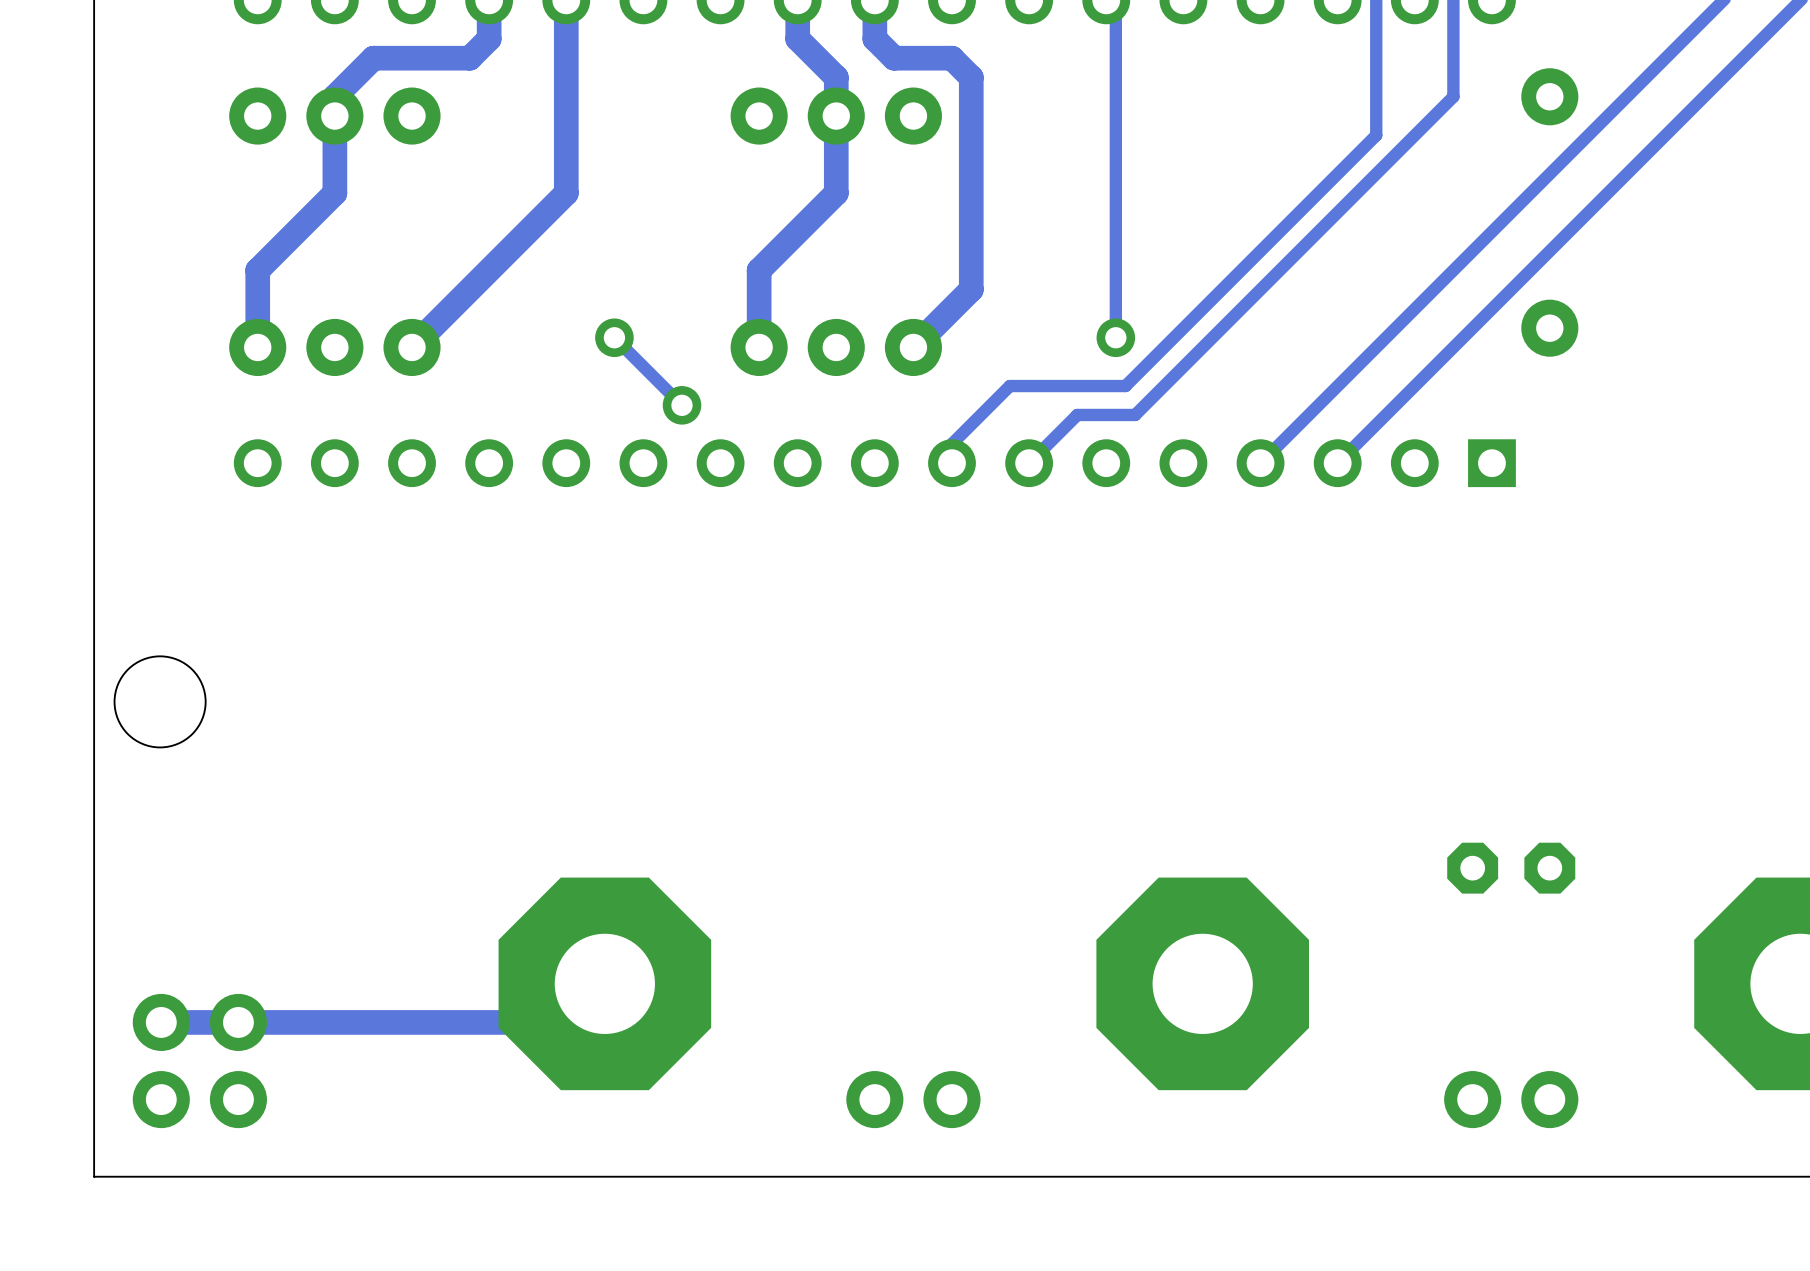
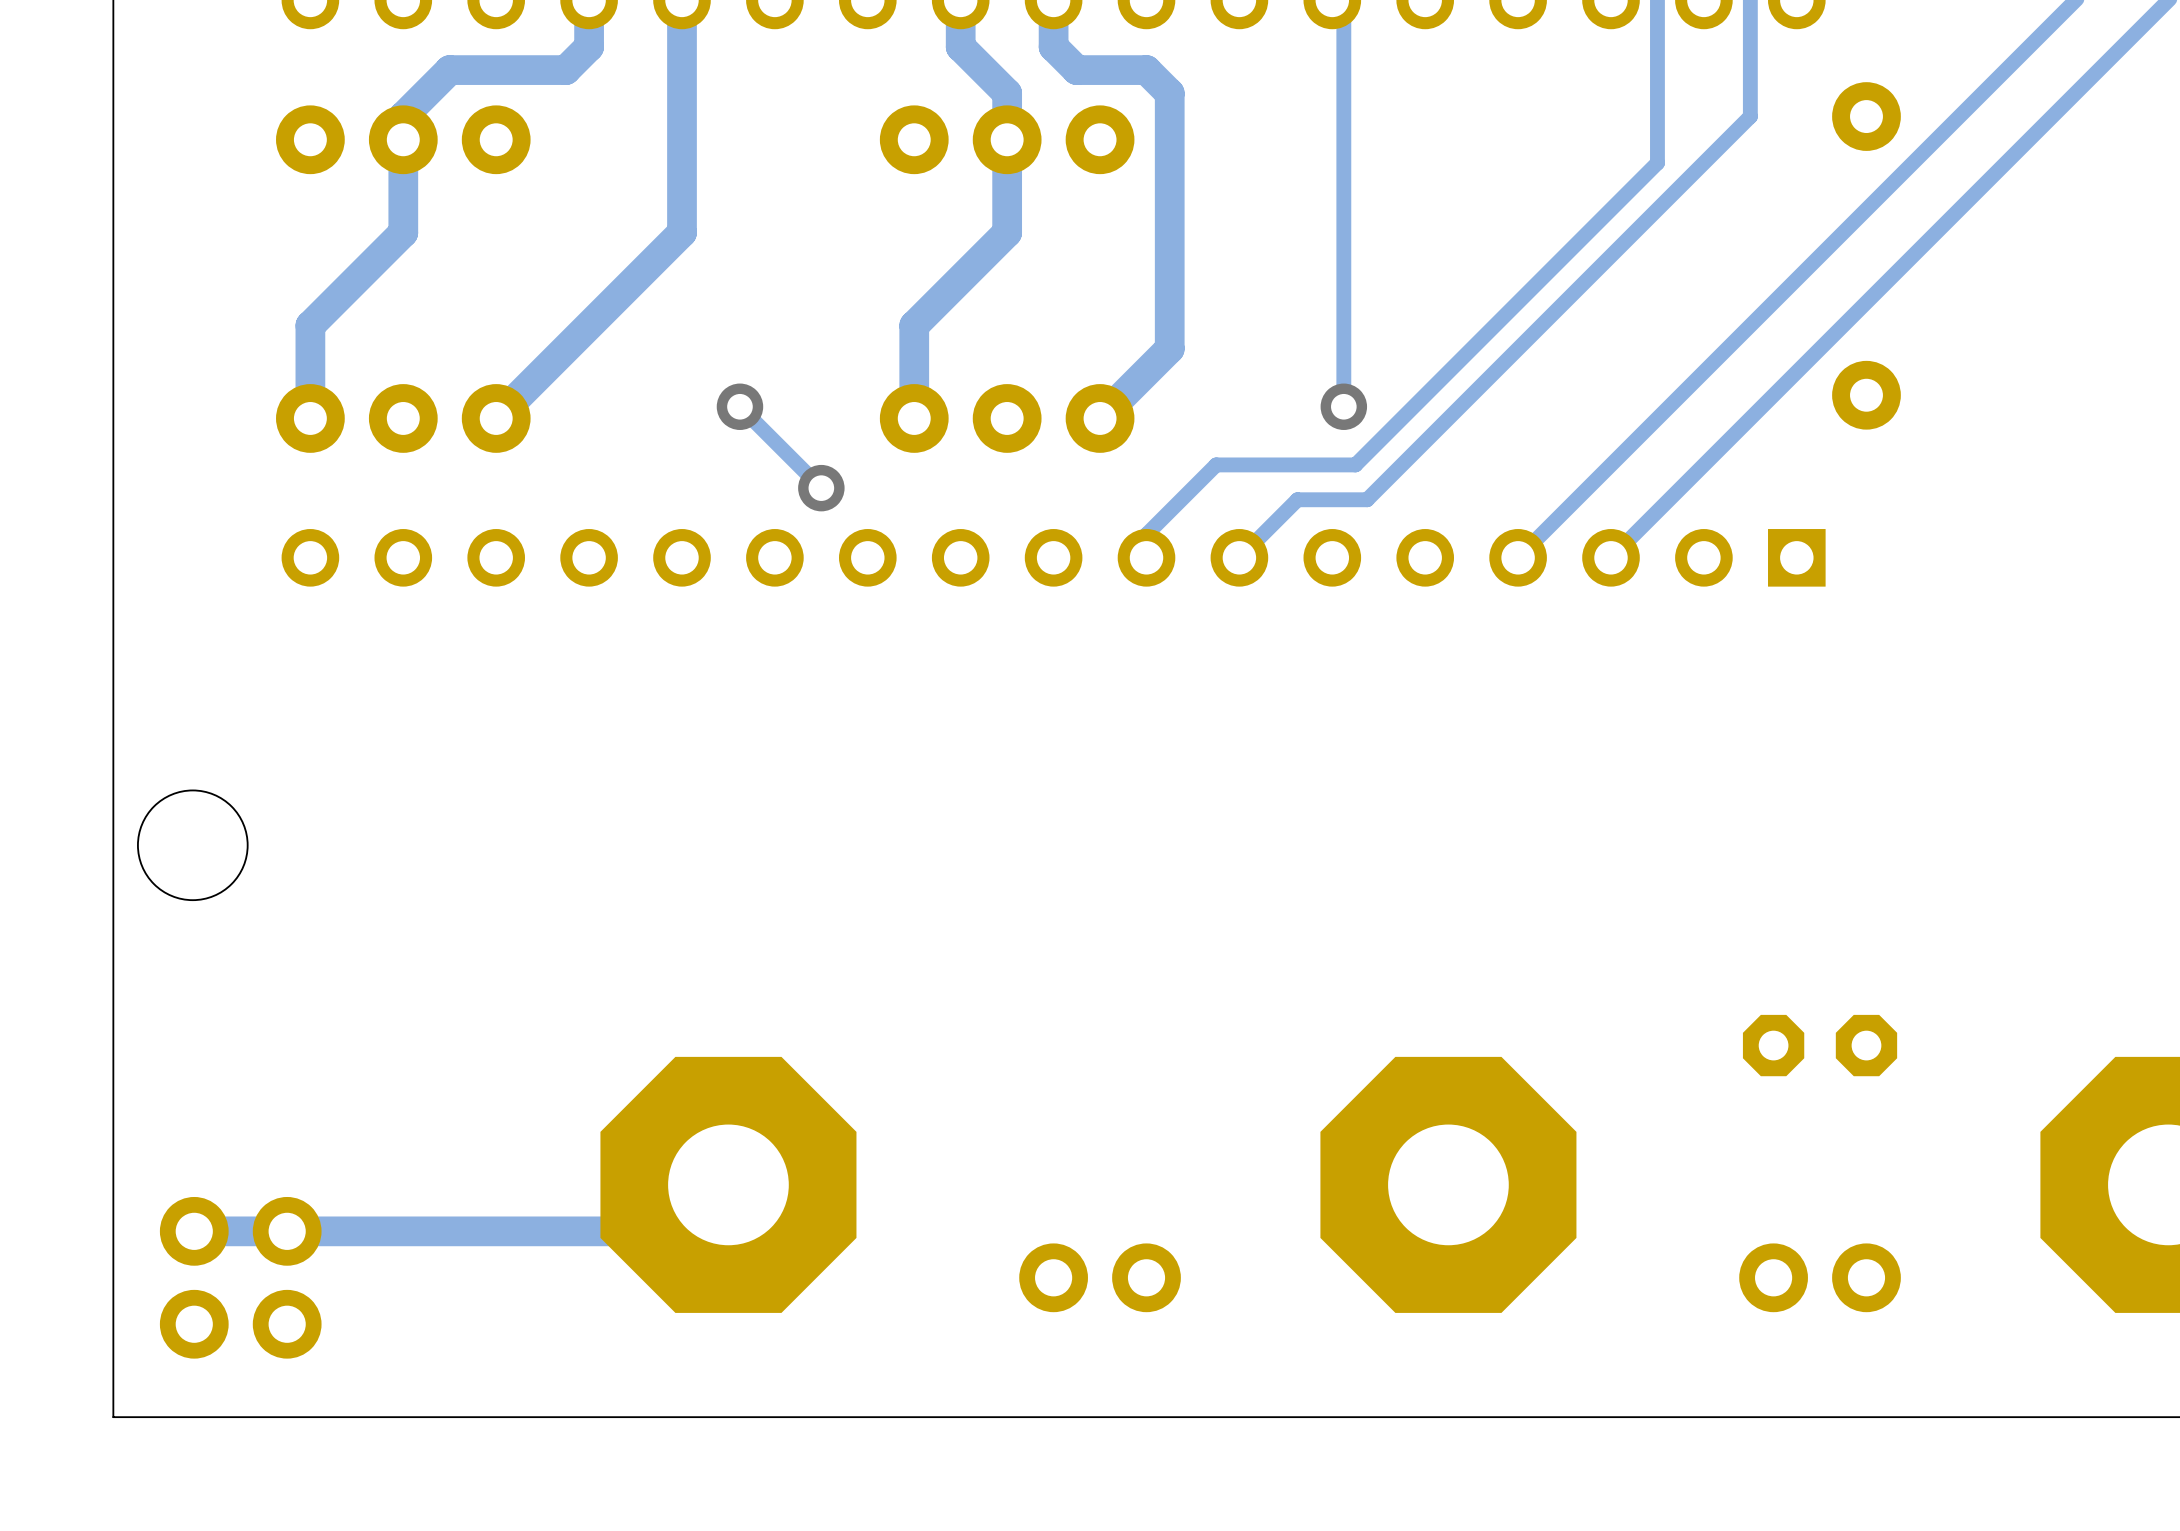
part position: (913, 1099) -> (1100, 1277)
part position: (1511, 1099) -> (1820, 1277)

